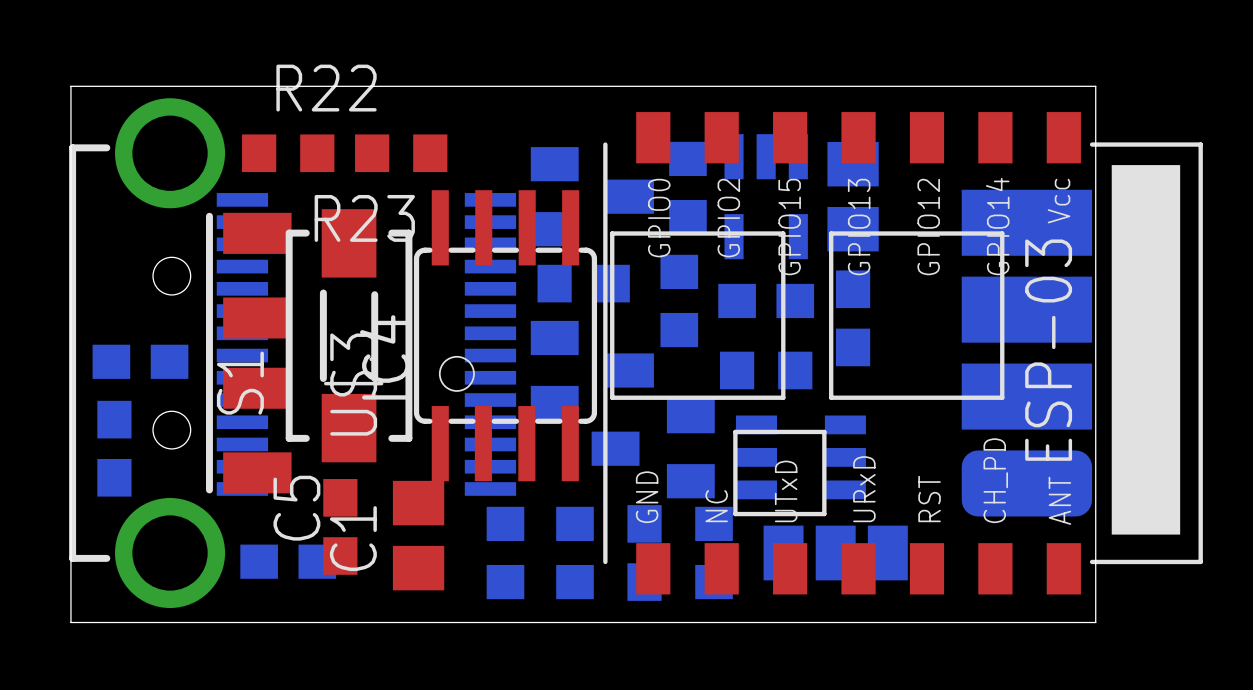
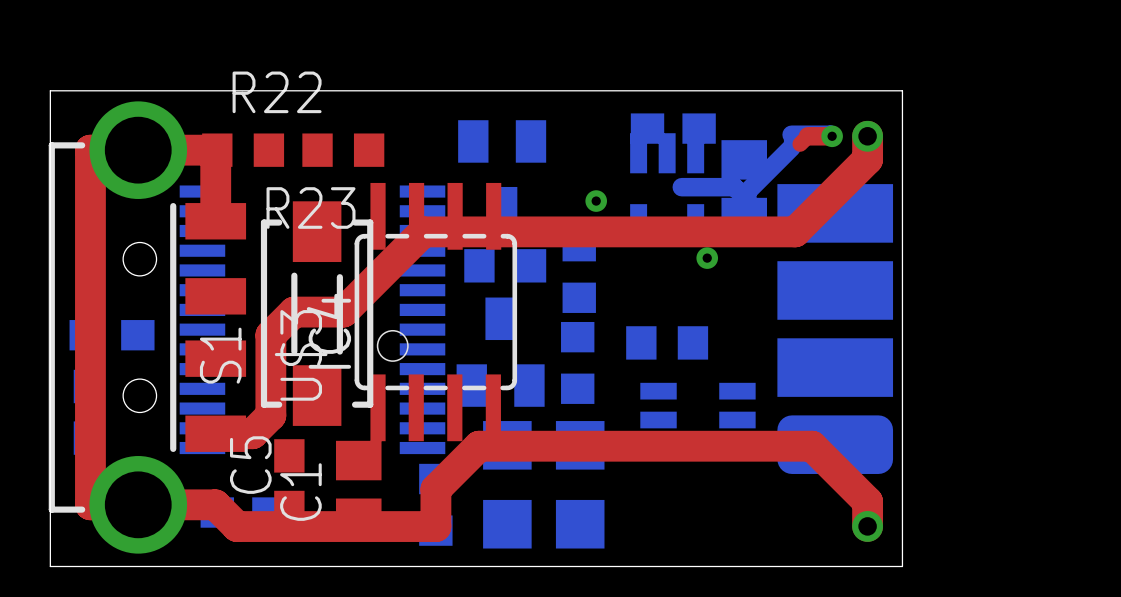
board edge: (1031, 86) (1095, 86) (1095, 622) (1031, 622) -> (902, 90) (902, 566)
part: none -> (673, 128)
top track: none -> (832, 136) (807, 136) (800, 144)
bottom track: none -> (832, 136) (791, 134) (791, 147) (747, 191) (747, 199) (734, 187) (681, 187)
via: none -> (832, 136)
top track: none -> (867, 136) (867, 159) (795, 231) (423, 231) (343, 312) (293, 312) (270, 335) (270, 415) (252, 433) (215, 433)
via: none -> (867, 136)
part: (687, 188) -> none
part rotation: 0° (592, 196) -> 90° clockwise (502, 174)
via: none -> (596, 201)
top track: none -> (215, 221) (215, 150) (90, 150) (90, 504) (215, 504) (237, 526) (435, 526) (435, 489) (479, 446) (812, 446) (867, 501) (867, 526)
via: none -> (707, 258)
part position: (679, 300) -> (579, 271)
part: (766, 300) -> none
part: (853, 318) -> none
S1 position: (349, 335) -> (317, 313)
part: (903, 353) -> none
part position: (1026, 353) -> (835, 329)
part rotation: 0° (592, 370) -> 90° counterclockwise (500, 352)
part: none -> (577, 362)
part: (653, 448) -> none
part: none -> (543, 484)
part: (575, 552) -> none
part: (644, 552) -> none
part: (714, 552) -> none
part: (835, 552) -> none
via: none -> (867, 526)

